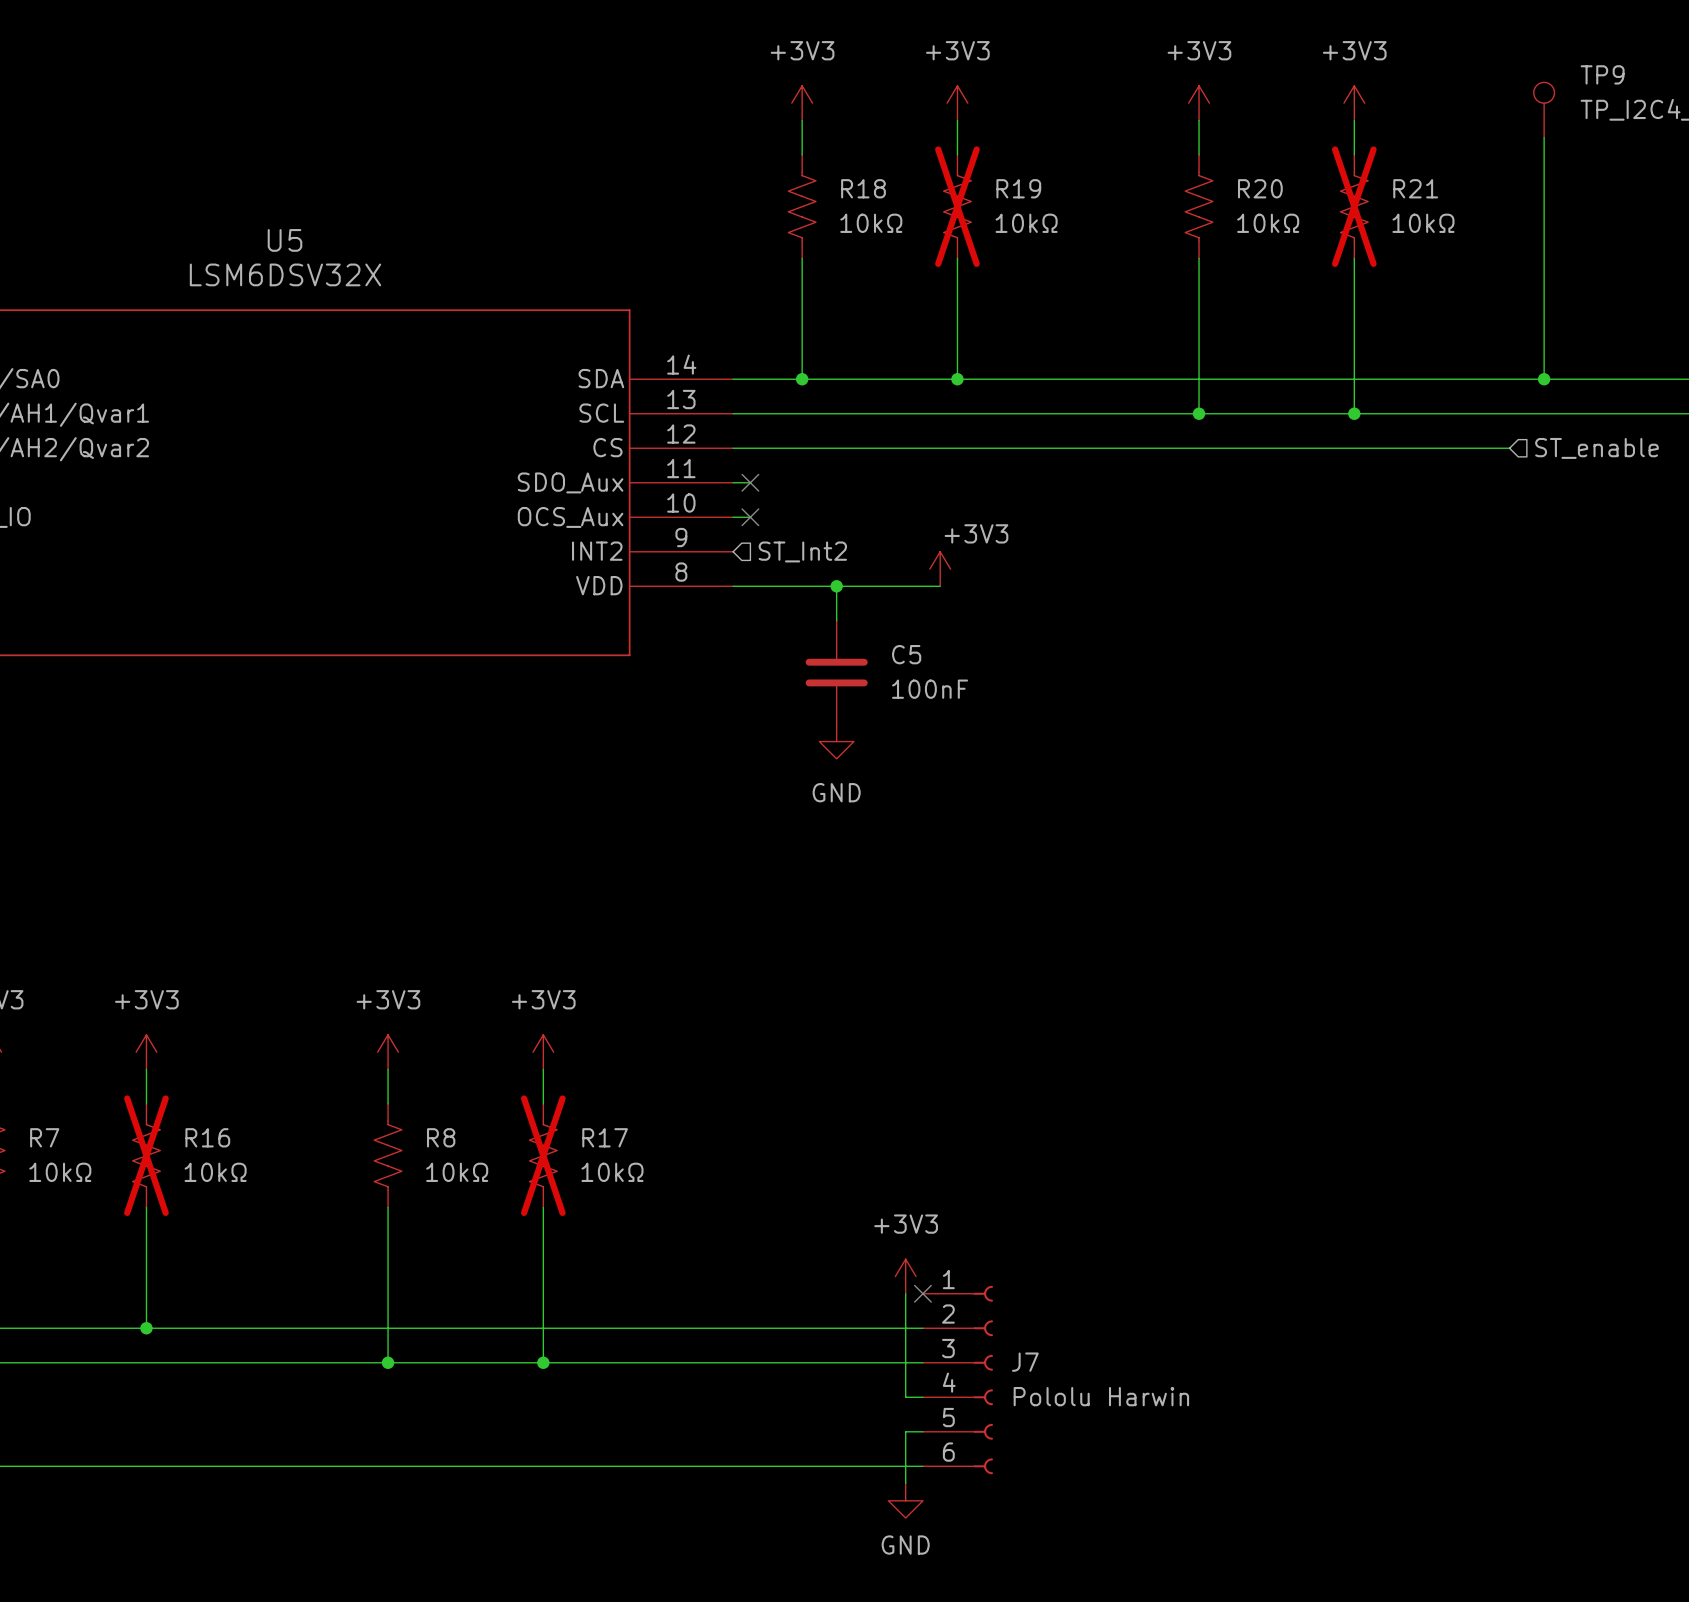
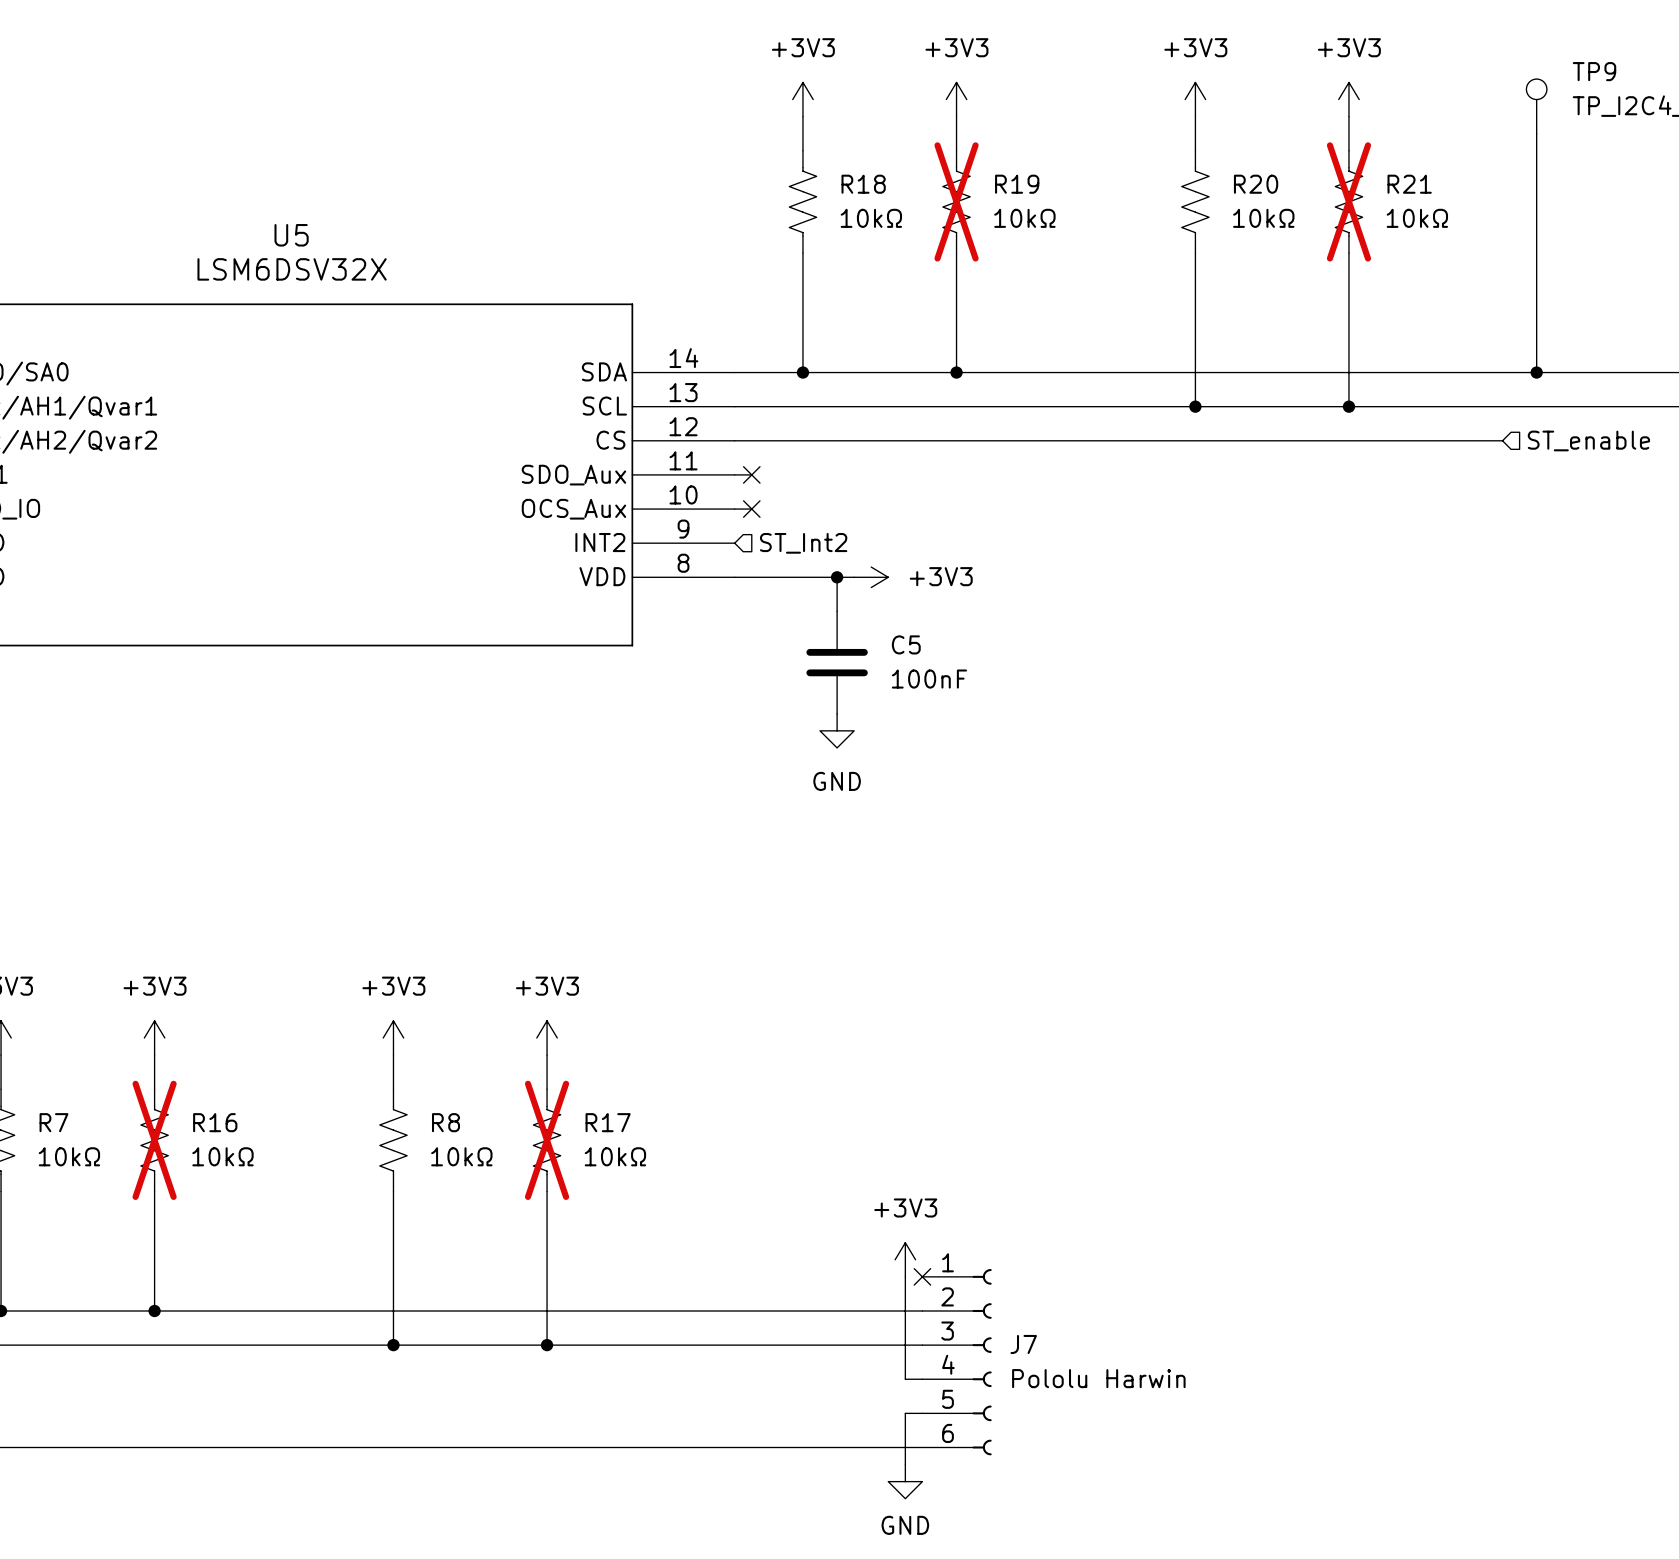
power symbol text position: +3V3 (976, 533) -> +3V3 (941, 576)
power symbol rotation: 0° (940, 569) -> 90° clockwise (871, 577)
power symbol position: +3V3 (940, 569) -> +3V3 (871, 577)
wire: (853, 586) (940, 586) -> none

